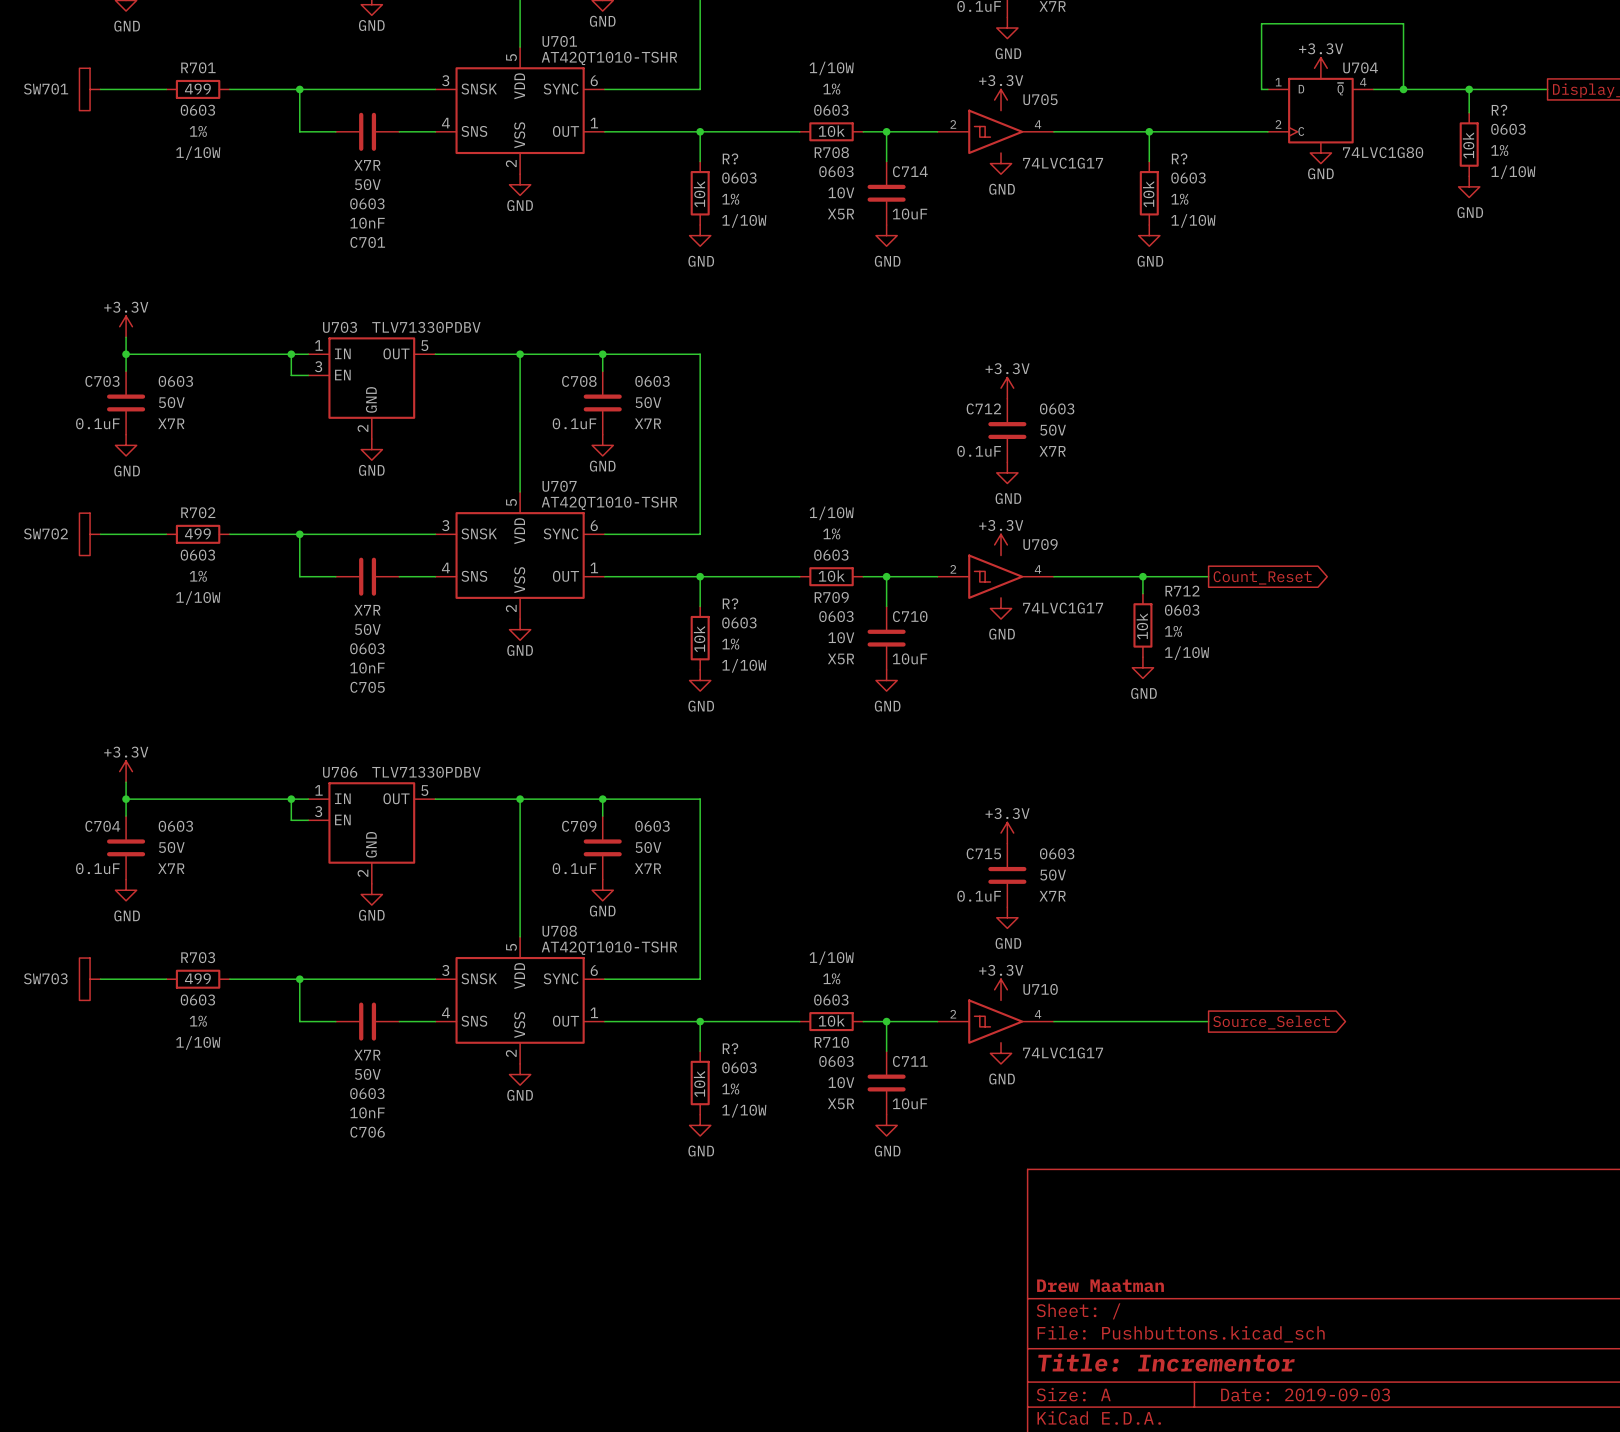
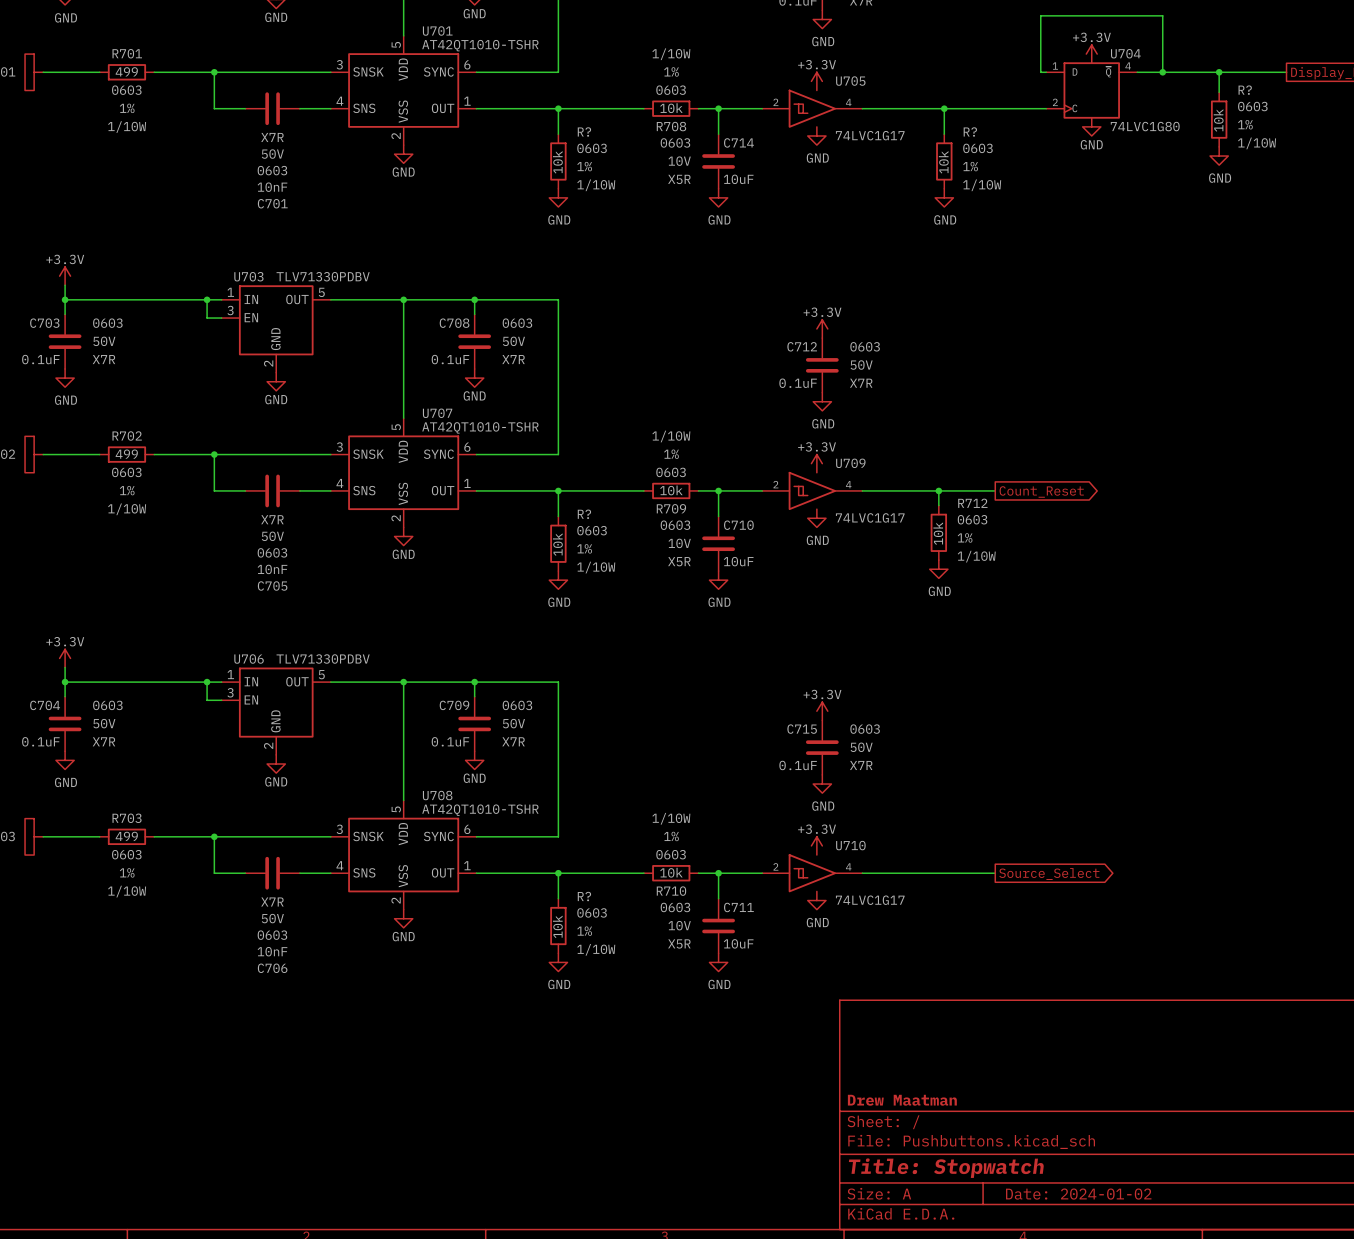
title block: Title: Incrementor (1166, 1362) -> Title: Stopwatch (946, 1168)
title block: Date: 2019-09-03 (1305, 1394) -> Date: 2024-01-02 (1078, 1194)

